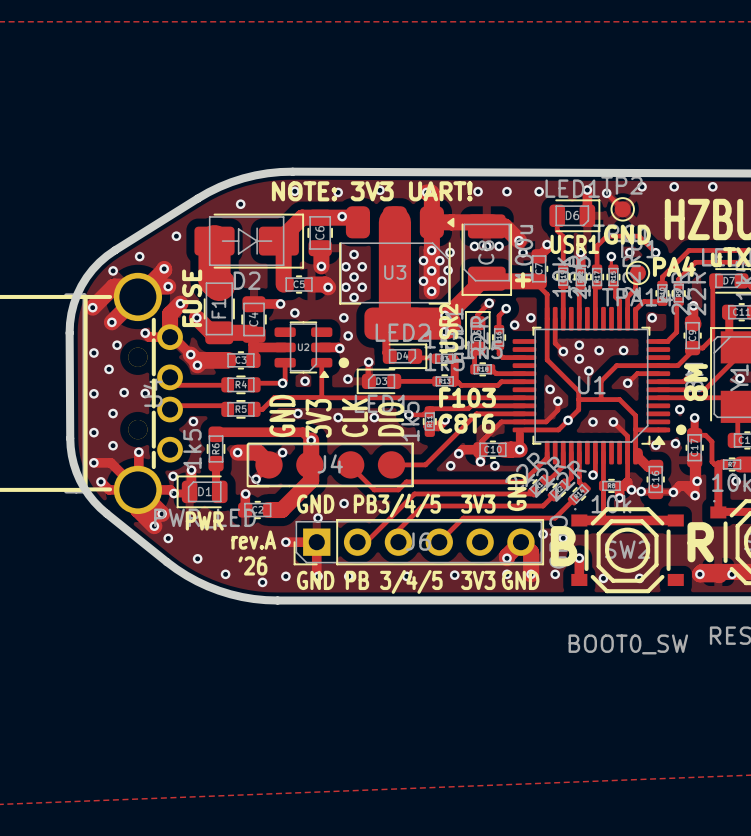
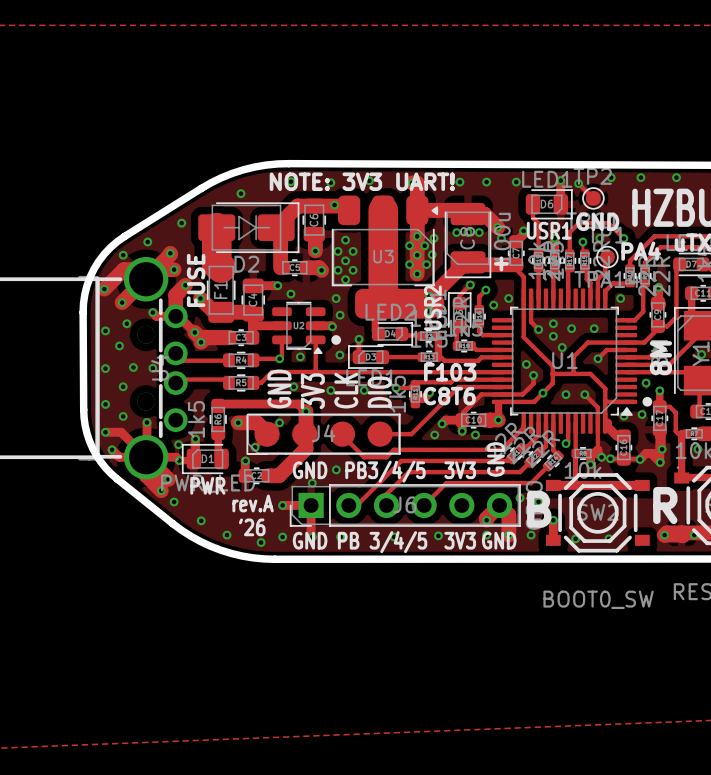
via: (193, 421) -> none

